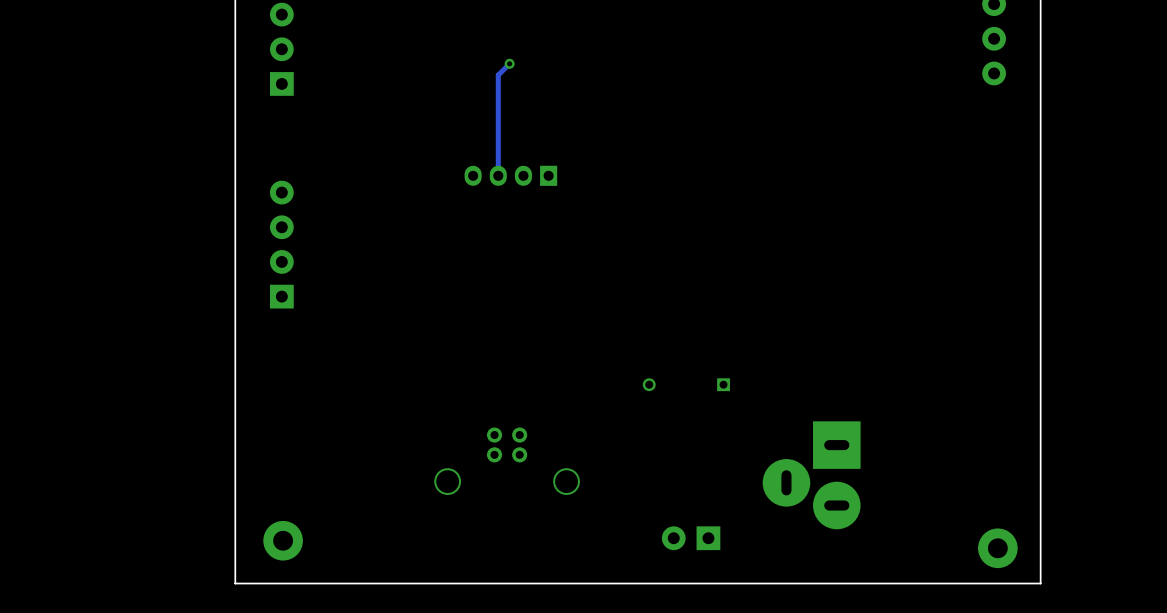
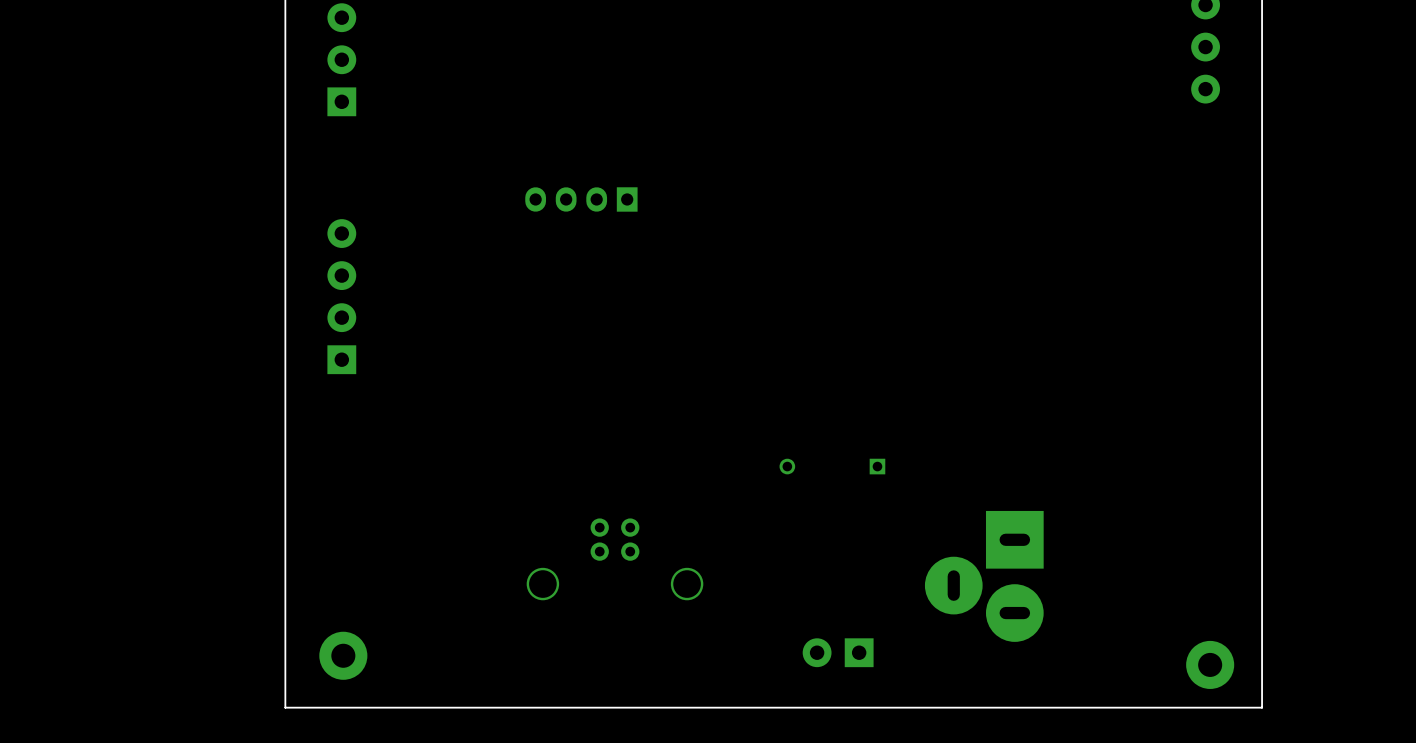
track: (509, 63) (498, 75) (498, 175) -> none
via: (509, 63) -> none
part position: (510, 175) -> (581, 199)

